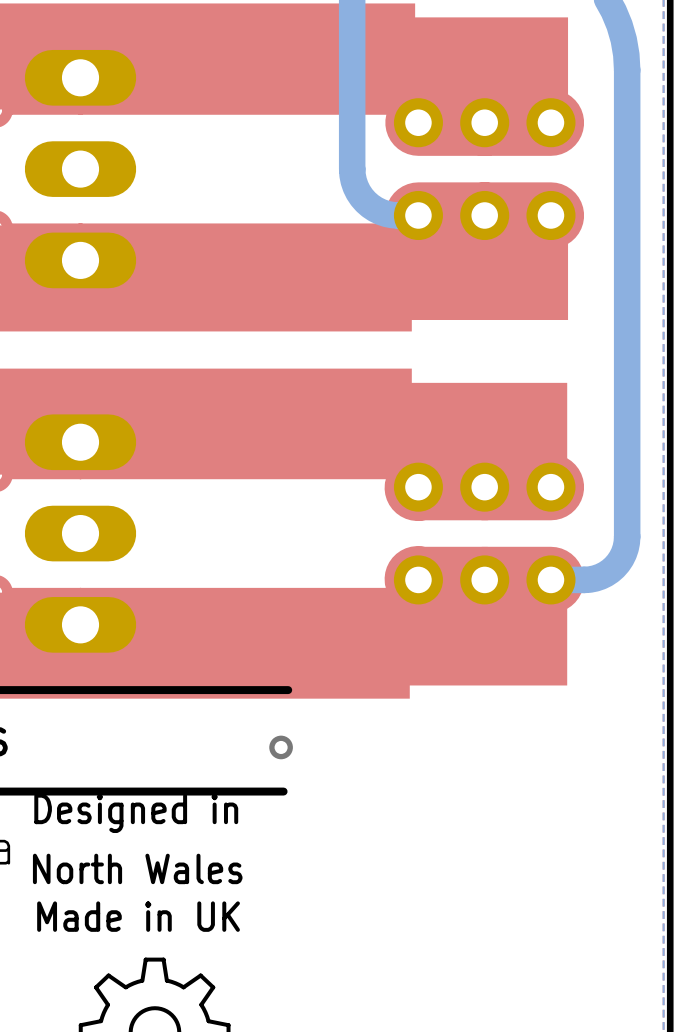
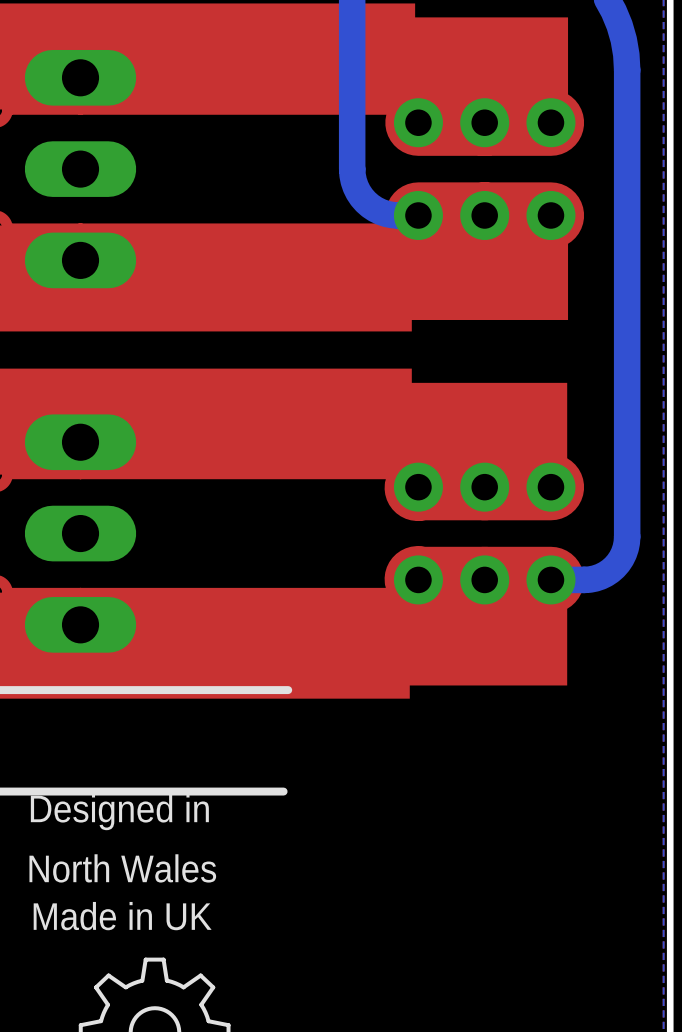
via: (281, 747) -> none

